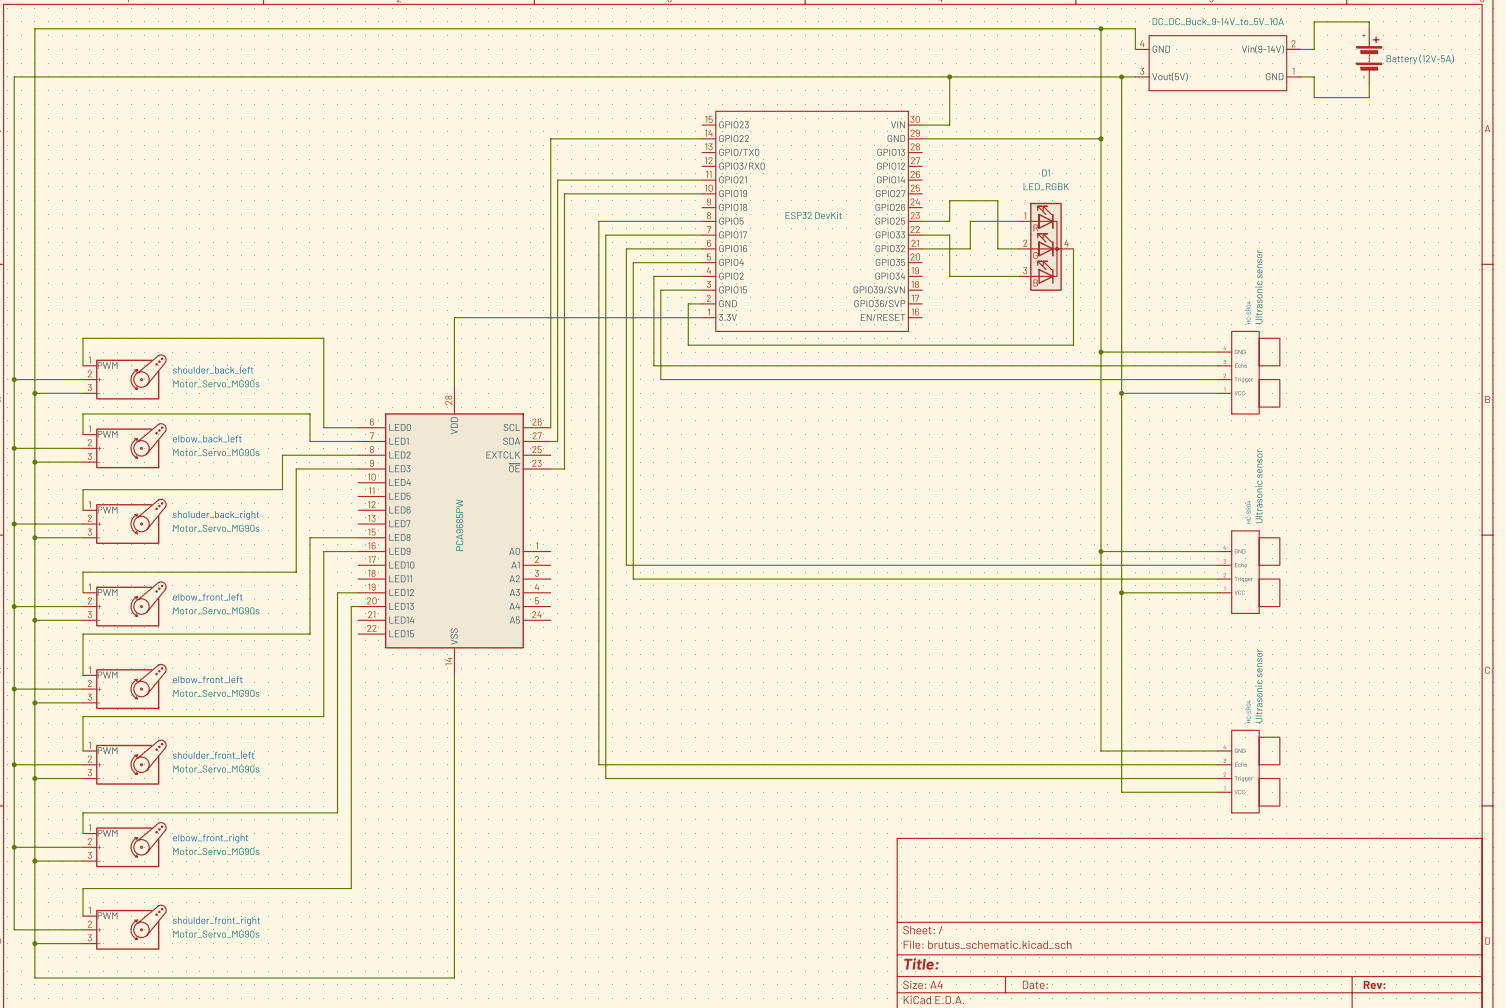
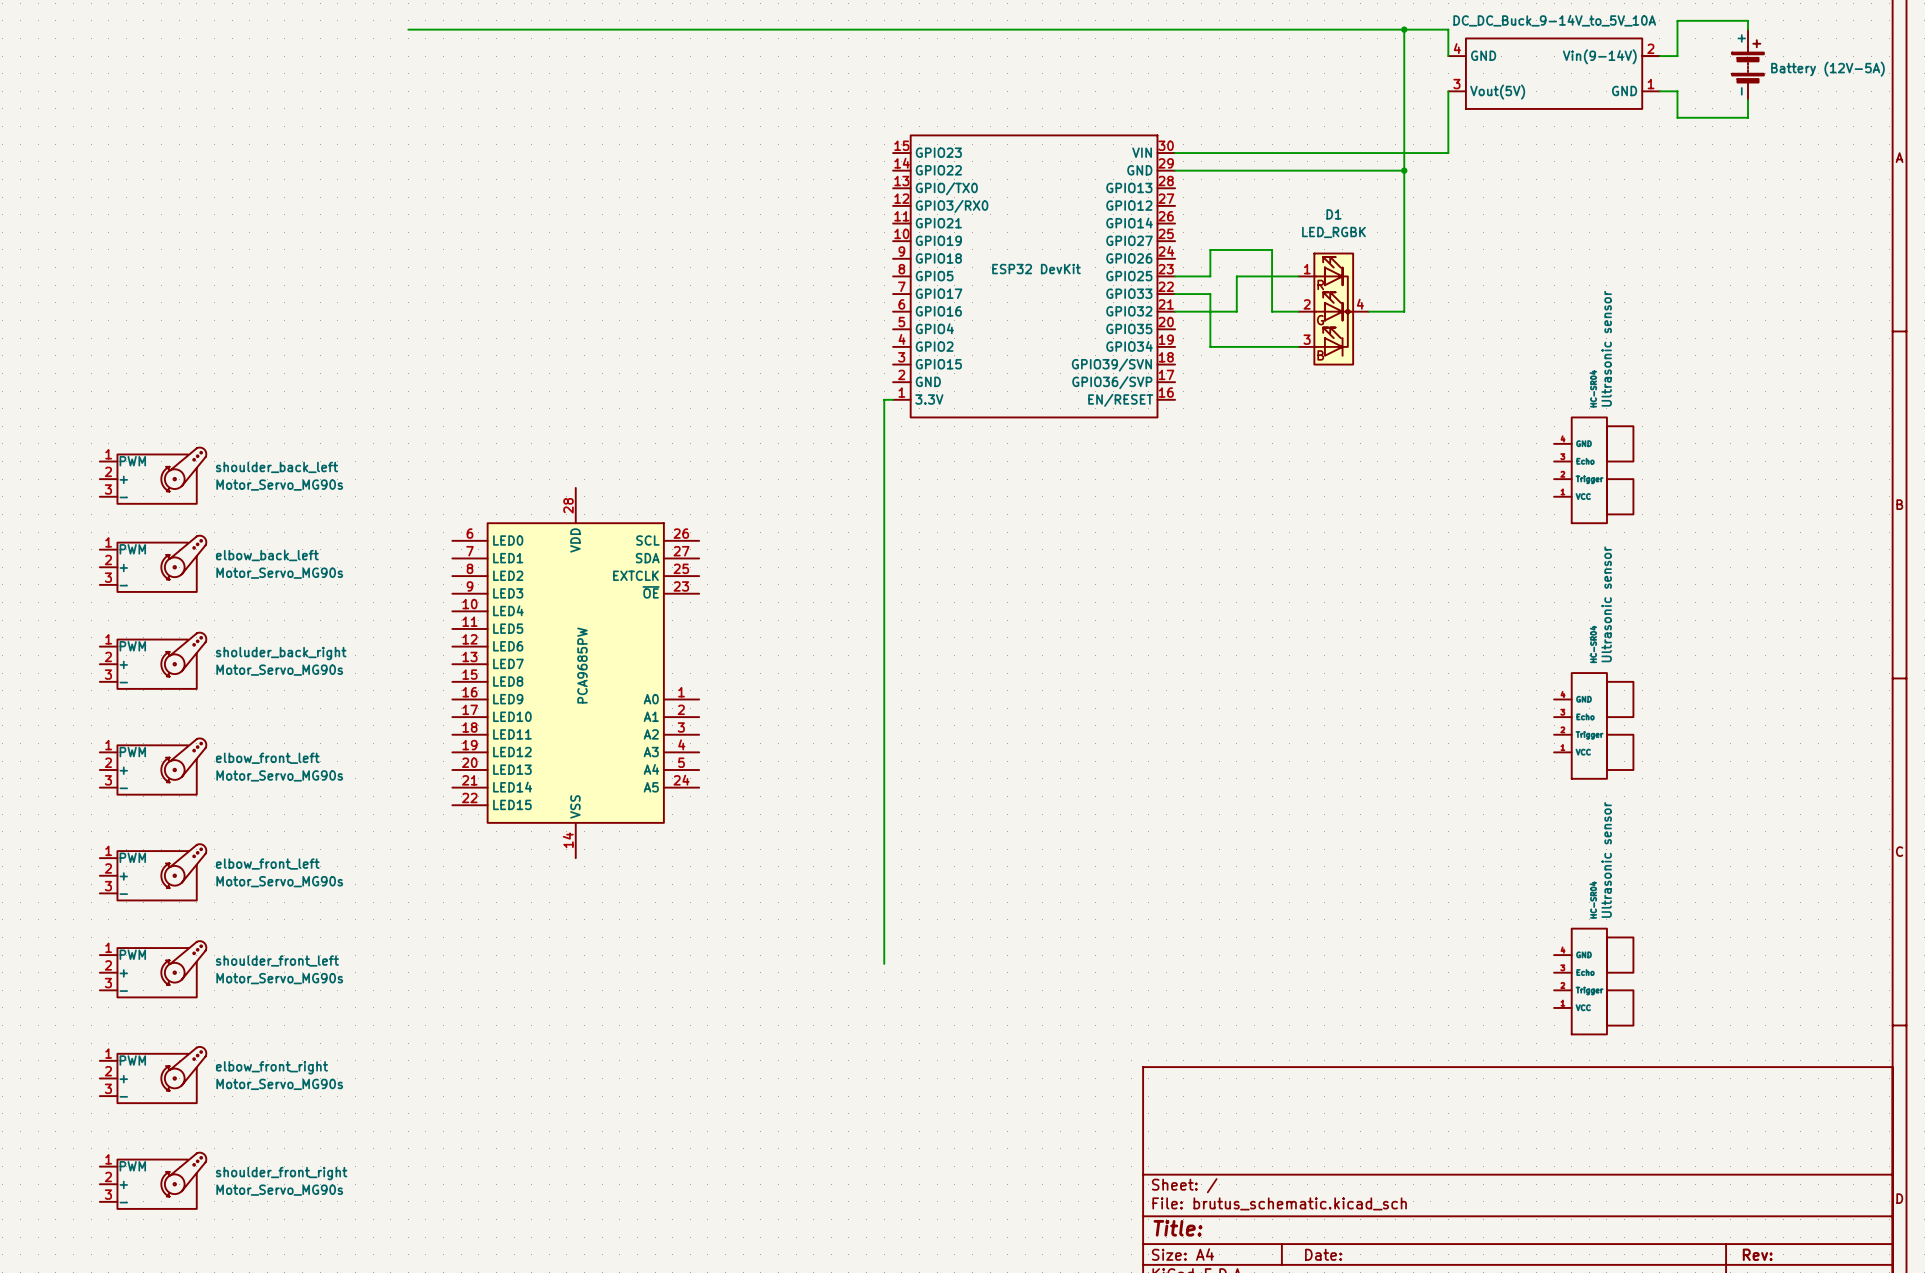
wire: (323, 28) (34, 28) (34, 977) (454, 977) (454, 675) -> none
wire: (949, 76) (949, 125) -> (1448, 91) (1448, 153) (1210, 153)
junction: (949, 76) -> none
wire: (1121, 76) (1121, 792) (1217, 792) -> none
junction: (1121, 76) -> none
wire: (1135, 76) (14, 76) (14, 929) (83, 929) -> none
wire: (702, 138) (550, 138) (550, 427) -> none
wire: (702, 180) (557, 180) (557, 441) (550, 441) -> none
wire: (702, 193) (564, 193) (564, 468) (550, 468) -> none
wire: (702, 221) (598, 221) (598, 764) (1217, 764) -> none
wire: (702, 235) (605, 235) (605, 778) (1217, 778) -> none
wire: (702, 248) (626, 248) (626, 565) (1217, 565) -> none
wire: (1073, 248) (1073, 345) (688, 345) (688, 303) (702, 303) -> (1369, 311) (1404, 311)
wire: (1100, 248) (1100, 751) (1217, 751) -> none
wire: (702, 262) (633, 262) (633, 579) (1217, 579) -> none
wire: (702, 276) (653, 276) (653, 365) (1217, 365) -> none
wire: (702, 290) (660, 290) (660, 379) (1217, 379) -> none
wire: (695, 317) (454, 317) (454, 386) -> (884, 399) (884, 963)
wire: (1100, 352) (1217, 352) -> none
junction: (1100, 352) -> none
wire: (83, 365) (83, 338) (323, 338) (323, 427) (358, 427) -> none
wire: (14, 379) (83, 379) -> none
junction: (14, 379) -> none
wire: (34, 393) (83, 393) -> none
junction: (34, 393) -> none
wire: (1121, 393) (1217, 393) -> none
junction: (1121, 393) -> none
wire: (83, 434) (83, 413) (309, 413) (309, 441) (358, 441) -> none
wire: (14, 448) (83, 448) -> none
junction: (14, 448) -> none
wire: (358, 455) (282, 455) (282, 489) (83, 489) (83, 510) -> none
wire: (34, 462) (83, 462) -> none
junction: (34, 462) -> none
wire: (358, 468) (296, 468) (296, 572) (83, 572) (83, 592) -> none
wire: (14, 524) (83, 524) -> none
junction: (14, 524) -> none
wire: (34, 537) (83, 537) -> none
junction: (34, 537) -> none
wire: (358, 537) (309, 537) (309, 634) (83, 634) (83, 675) -> none
wire: (358, 551) (323, 551) (323, 716) (83, 716) (83, 751) -> none
wire: (1100, 551) (1217, 551) -> none
junction: (1100, 551) -> none
wire: (358, 592) (337, 592) (337, 812) (83, 812) (83, 833) -> none
wire: (1121, 592) (1217, 592) -> none
junction: (1121, 592) -> none
wire: (14, 606) (83, 606) -> none
junction: (14, 606) -> none
wire: (358, 606) (351, 606) (351, 888) (83, 888) (83, 916) -> none
wire: (34, 620) (83, 620) -> none
junction: (34, 620) -> none
wire: (14, 689) (83, 689) -> none
junction: (14, 689) -> none
wire: (34, 702) (83, 702) -> none
junction: (34, 702) -> none
wire: (14, 764) (83, 764) -> none
junction: (14, 764) -> none
wire: (34, 778) (83, 778) -> none
junction: (34, 778) -> none
wire: (14, 847) (83, 847) -> none
junction: (14, 847) -> none
wire: (34, 861) (83, 861) -> none
junction: (34, 861) -> none
wire: (34, 943) (83, 943) -> none
junction: (34, 943) -> none

